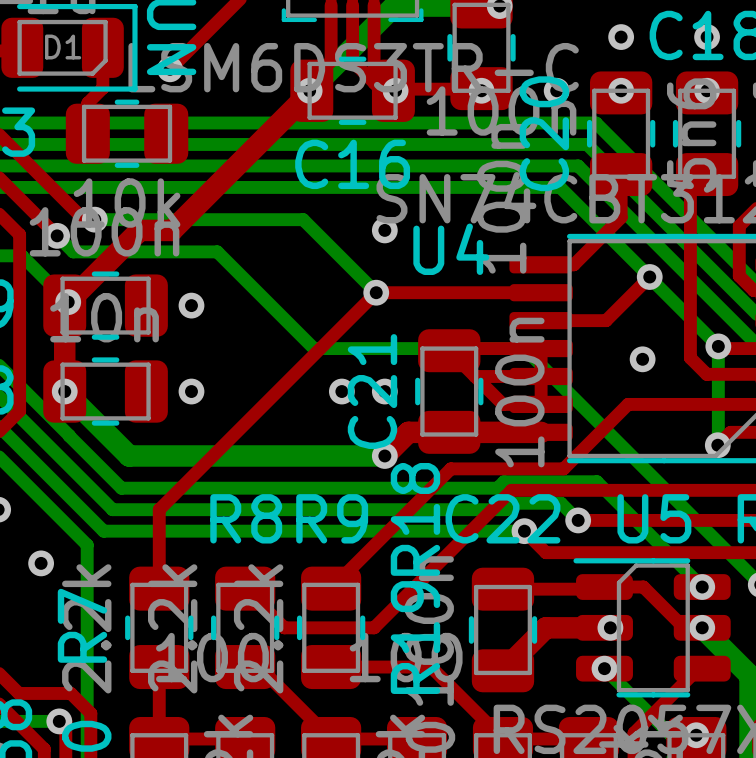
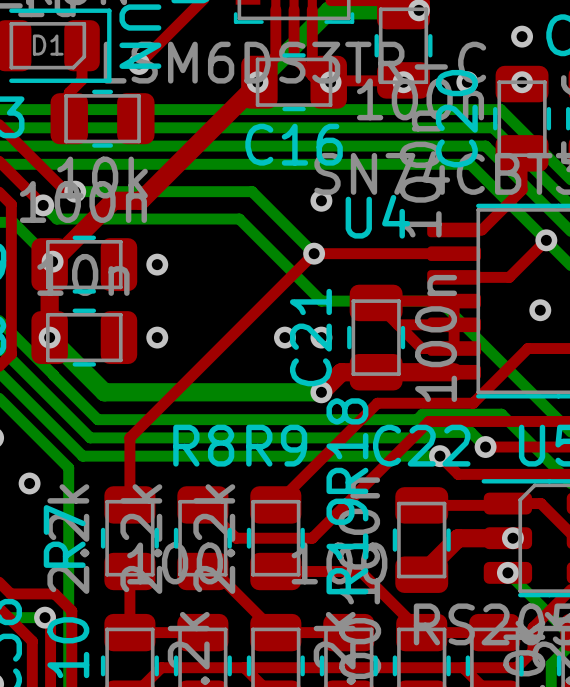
bottom track: (217, 251) (313, 348) (384, 348) -> (179, 219) (239, 219) (321, 301)

